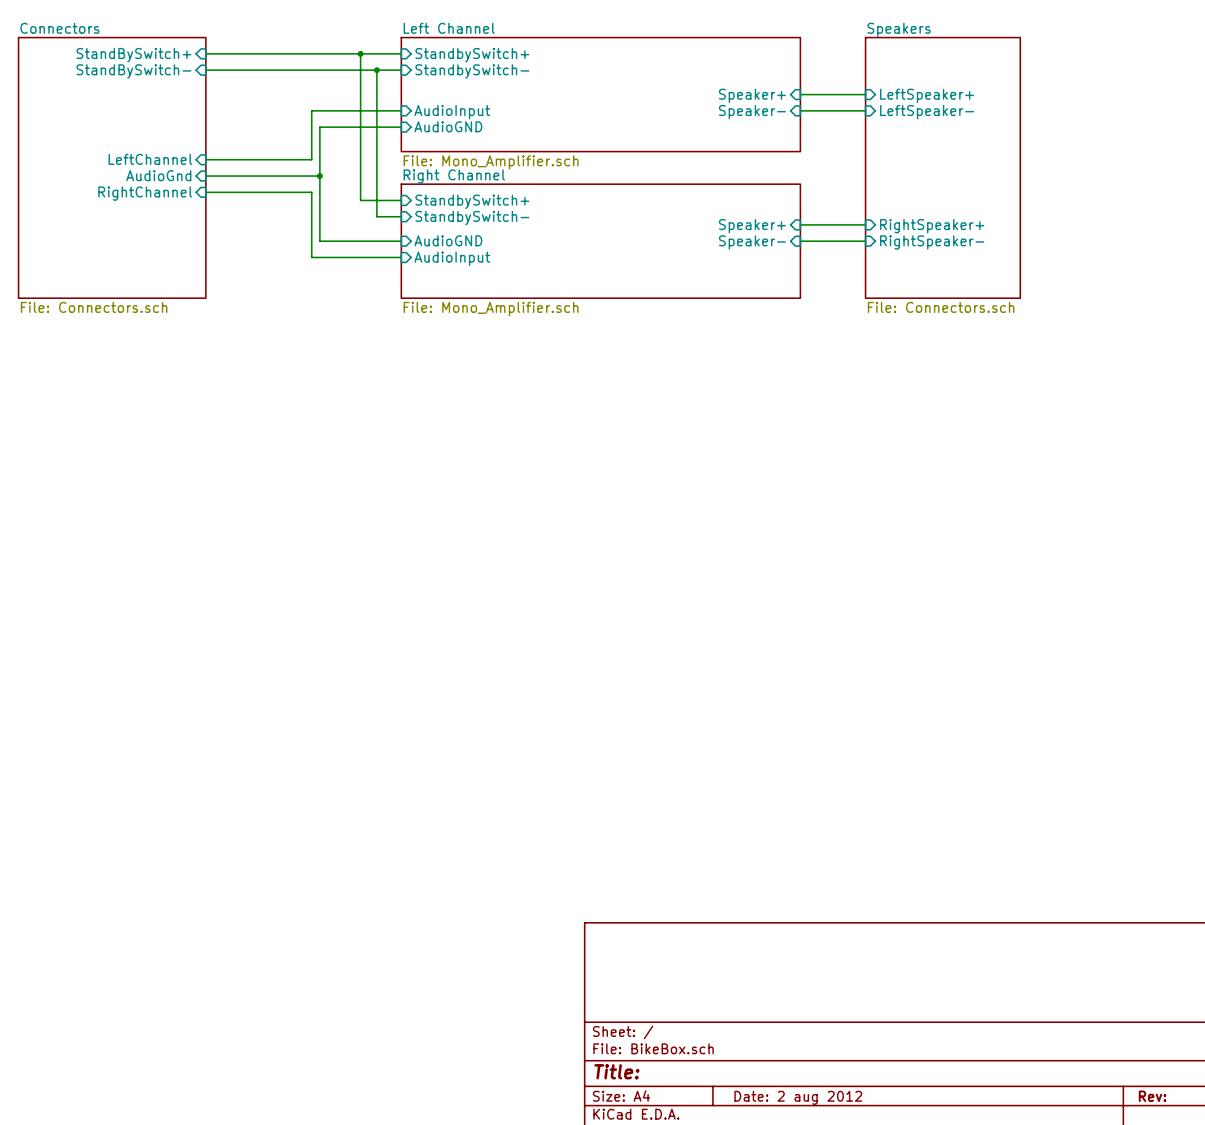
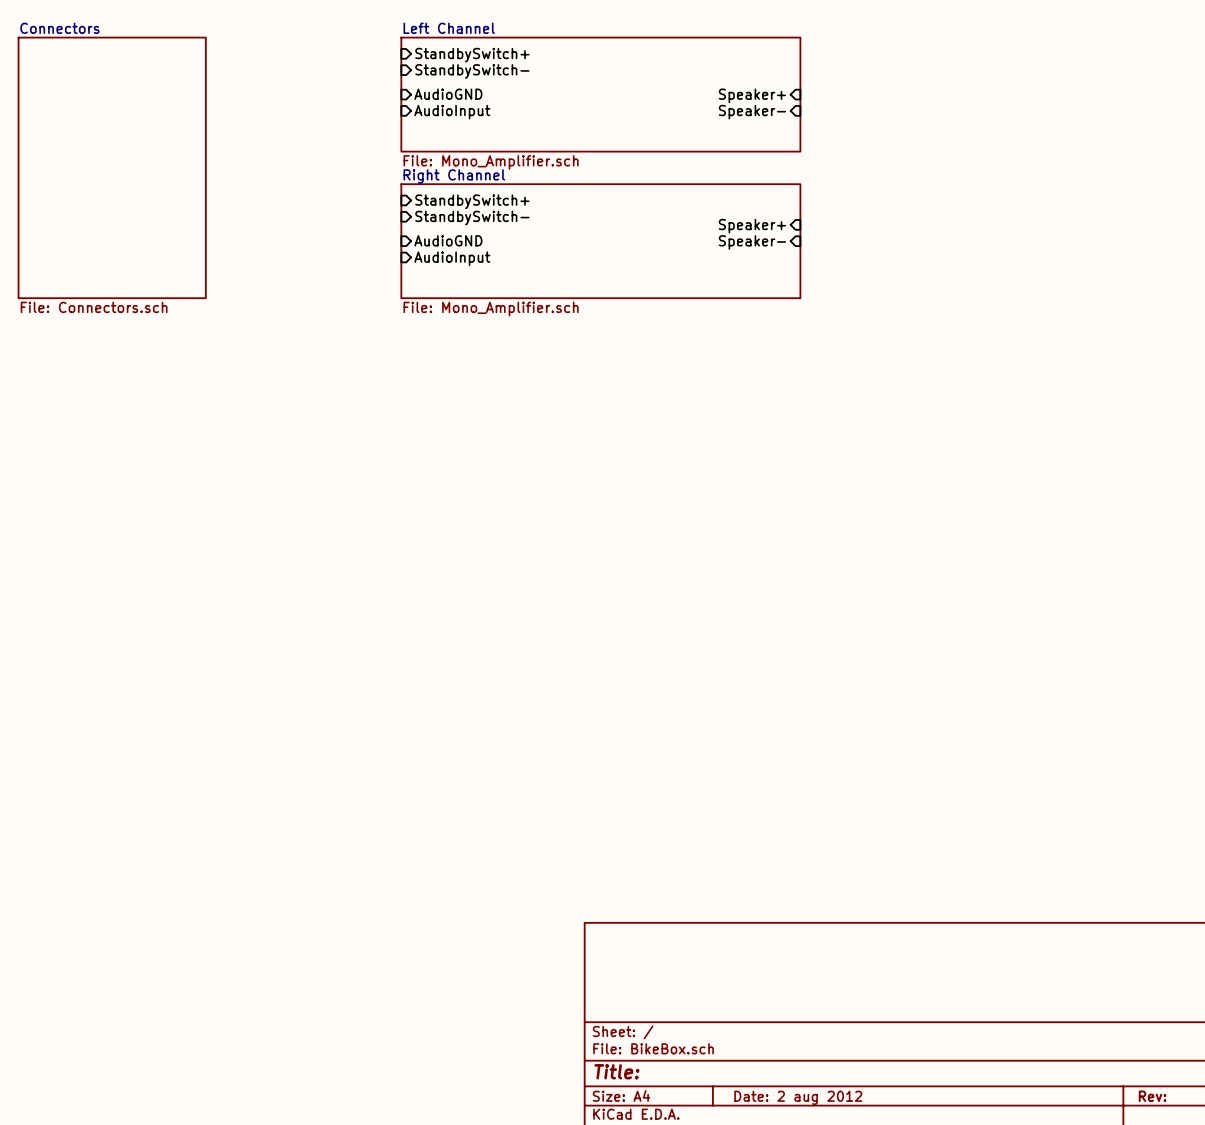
wire: (205, 53) (401, 53) -> none
wire: (360, 53) (360, 200) (401, 200) -> none
junction: (360, 53) -> none
sheet pin: StandBySwitch+ (133, 55) -> none
wire: (205, 70) (401, 70) -> none
wire: (376, 70) (376, 216) (401, 216) -> none
junction: (376, 70) -> none
sheet pin: StandBySwitch- (133, 71) -> none
wire: (800, 94) (865, 94) -> none
sheet pin: LeftSpeaker+ (927, 95) -> none
wire: (401, 110) (311, 110) (311, 159) (205, 159) -> none
wire: (800, 110) (865, 110) -> none
sheet pin: LeftSpeaker- (927, 112) -> none
sheet pin position: AudioGND (448, 126) -> AudioGND (448, 94)
wire: (401, 127) (319, 127) (319, 241) (401, 241) -> none
sheet pin: LeftChannel (150, 159) -> none
sheet Speakers: File: Connectors.sch (942, 167) -> none
sheet pin: AudioGnd (158, 175) -> none
wire: (205, 176) (319, 176) -> none
junction: (319, 176) -> none
wire: (205, 192) (311, 192) (311, 257) (401, 257) -> none
sheet pin: RightChannel (145, 193) -> none
wire: (800, 224) (865, 224) -> none
sheet pin: RightSpeaker+ (932, 226) -> none
wire: (800, 241) (865, 241) -> none
sheet pin: RightSpeaker- (932, 242) -> none

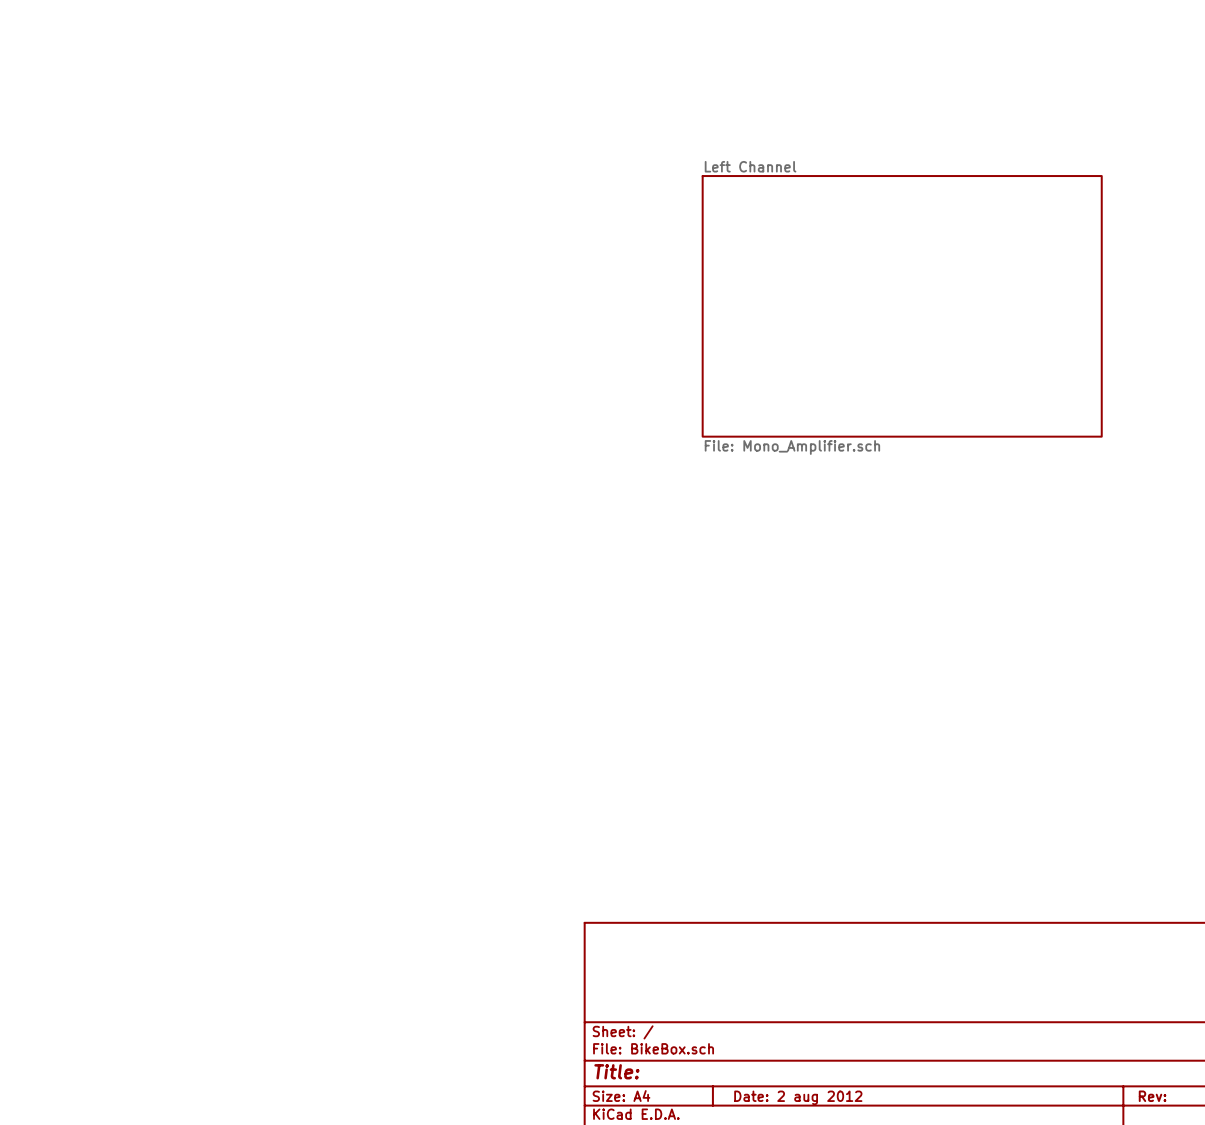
sheet pin: StandbySwitch+ (472, 55) -> none
sheet pin: StandbySwitch- (472, 71) -> none
sheet pin: AudioGND (448, 94) -> none
sheet Left Channel: File: Mono_Amplifier.sch (600, 94) -> none
sheet pin: Speaker+ (752, 95) -> none
sheet pin: AudioInput (452, 112) -> none
sheet pin: Speaker- (752, 112) -> none
sheet Connectors: File: Connectors.sch (112, 167) -> none
sheet pin: StandbySwitch+ (472, 201) -> none
sheet pin: StandbySwitch- (472, 218) -> none
sheet pin: Speaker+ (752, 226) -> none
sheet pin: AudioGND (448, 240) -> none
sheet Right Channel: File: Mono_Amplifier.sch (600, 241) -> none
sheet pin: Speaker- (752, 242) -> none
sheet pin: AudioInput (452, 258) -> none
sheet Left Channel: none -> File: Mono_Amplifier.sch (902, 306)

